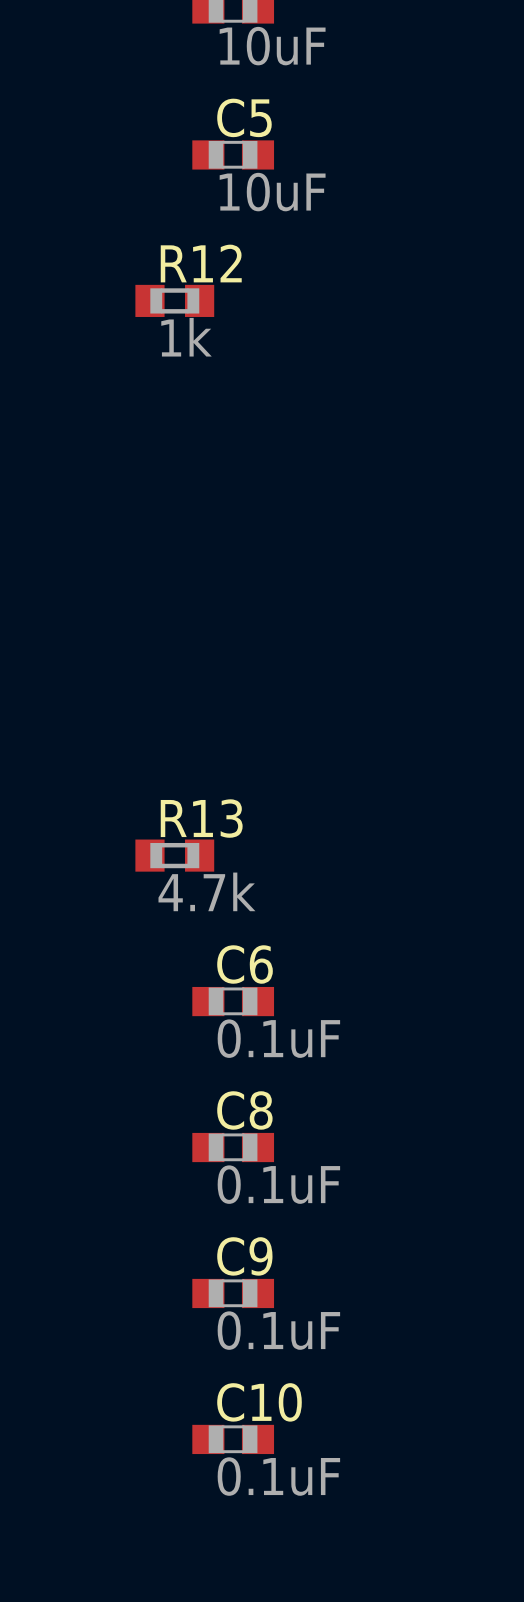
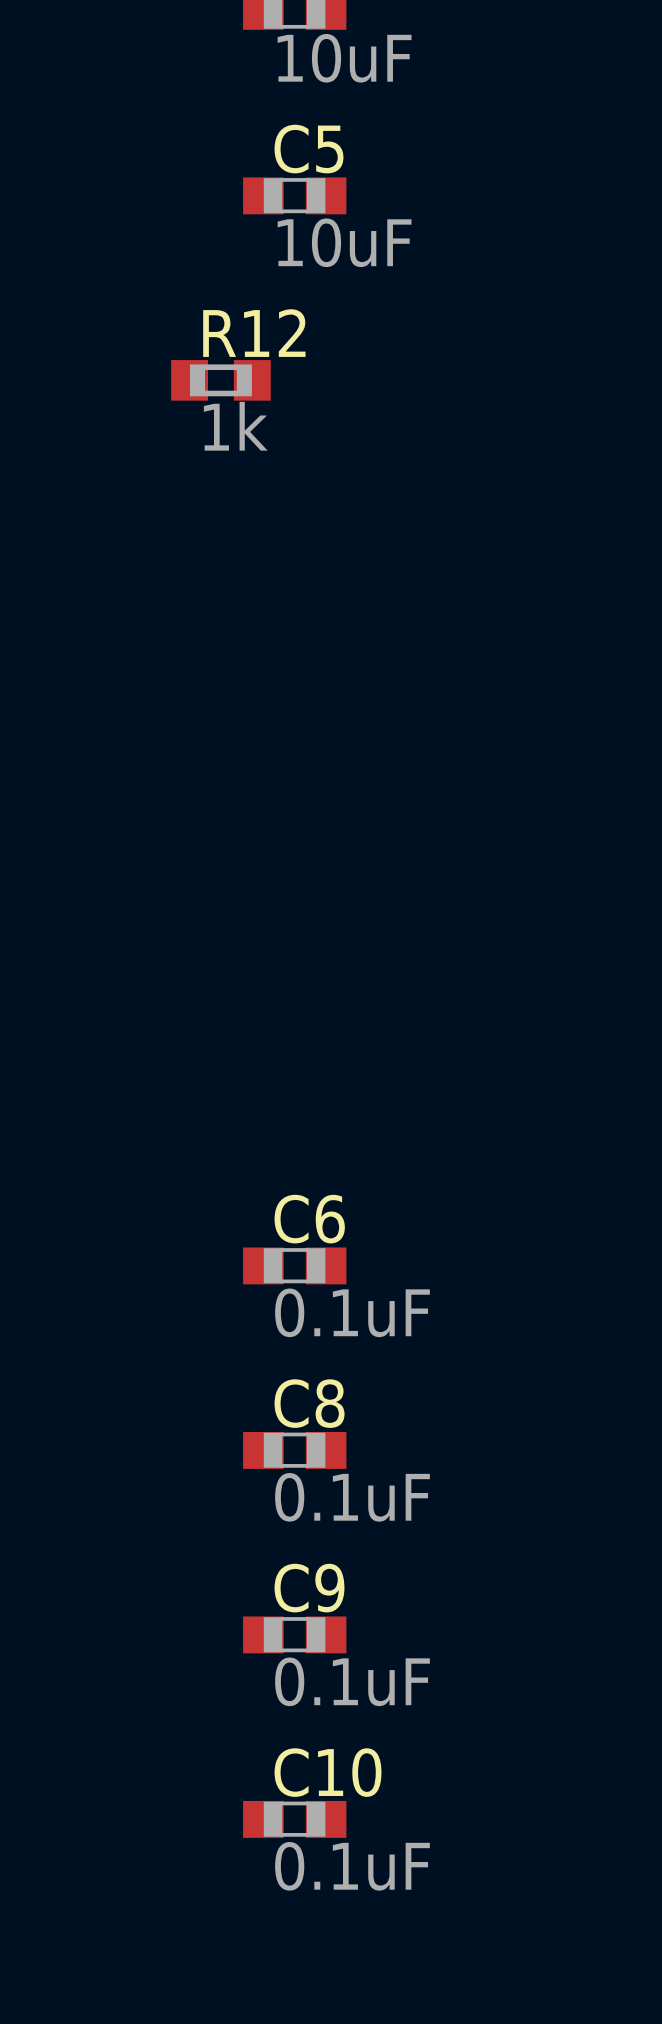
R13: 4.7k (174, 855) -> none

